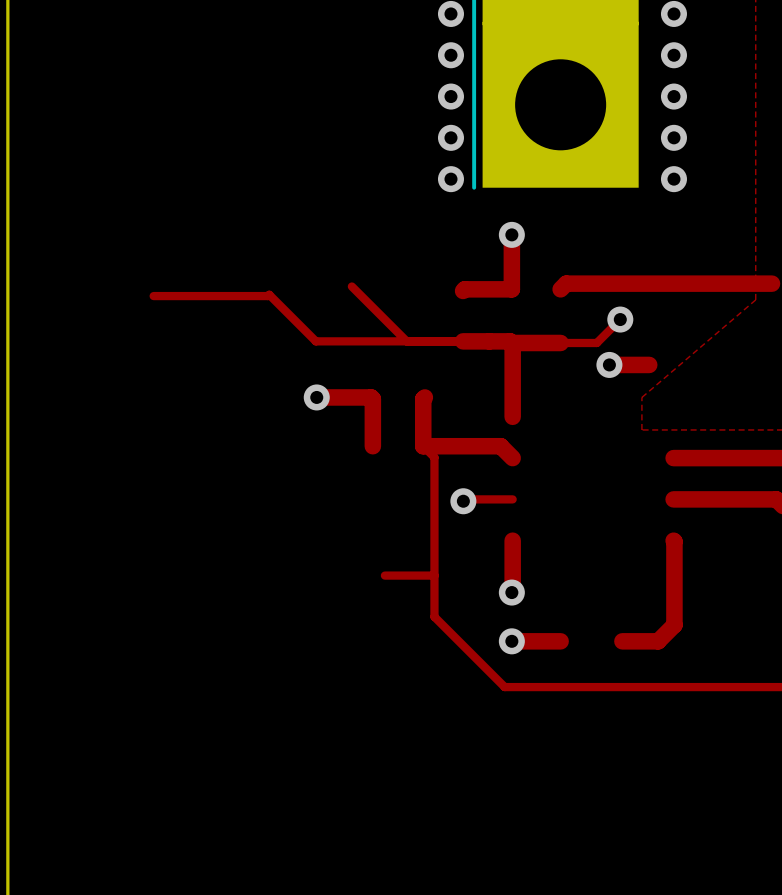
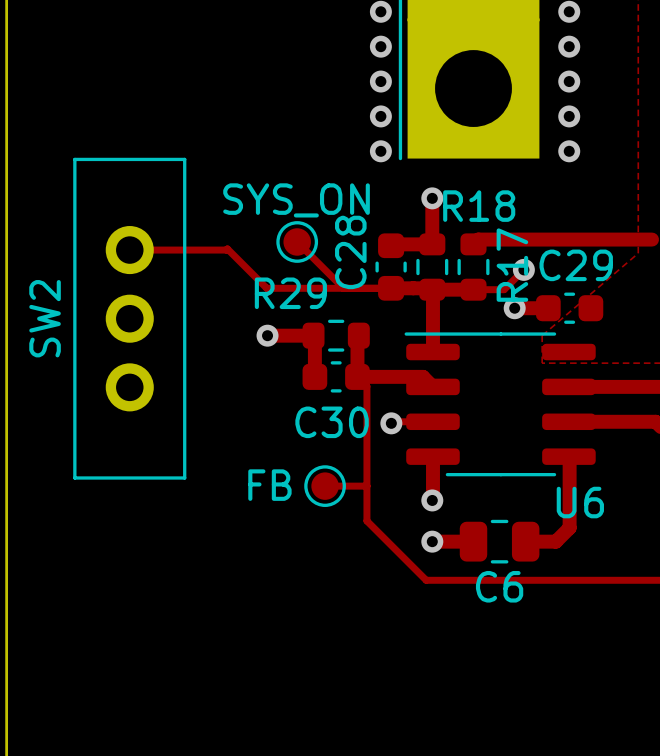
SYS_ON: none -> (297, 241)
C28: none -> (391, 267)
R18: none -> (432, 267)
R17: none -> (473, 267)
C29: none -> (569, 308)
SW2: none -> (129, 318)
R29: none -> (336, 335)
C30: none -> (336, 376)
U6: none -> (500, 404)
FB: none -> (325, 486)
C6: none -> (499, 541)

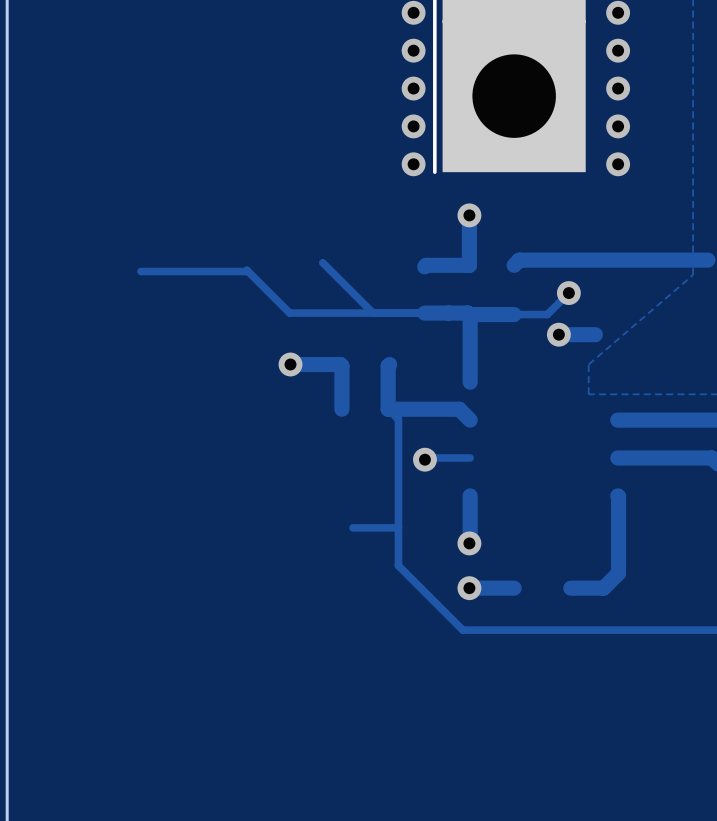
SYS_ON: (297, 241) -> none
C28: (391, 267) -> none
R18: (432, 267) -> none
R17: (473, 267) -> none
C29: (569, 308) -> none
SW2: (129, 318) -> none
R29: (336, 335) -> none
C30: (336, 376) -> none
U6: (500, 404) -> none
FB: (325, 486) -> none
C6: (499, 541) -> none

